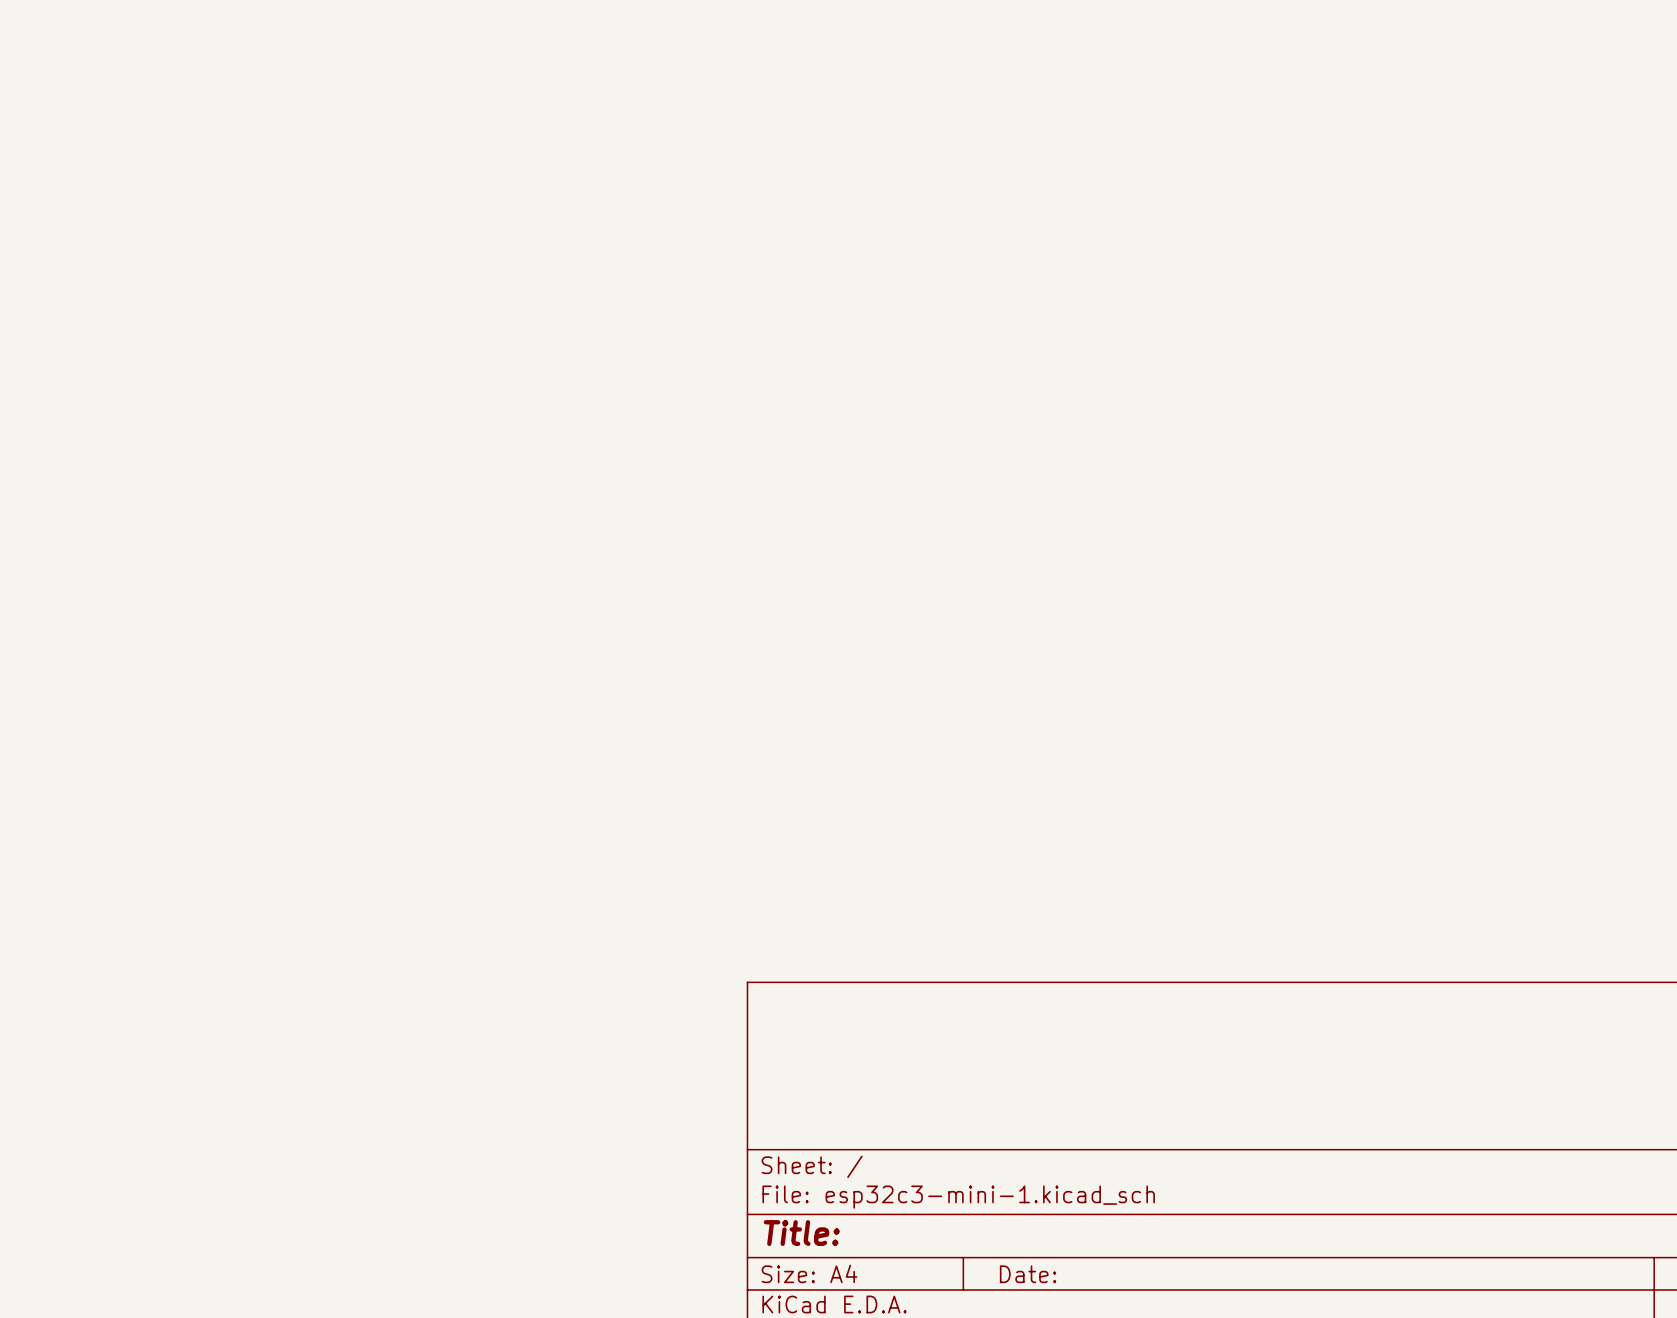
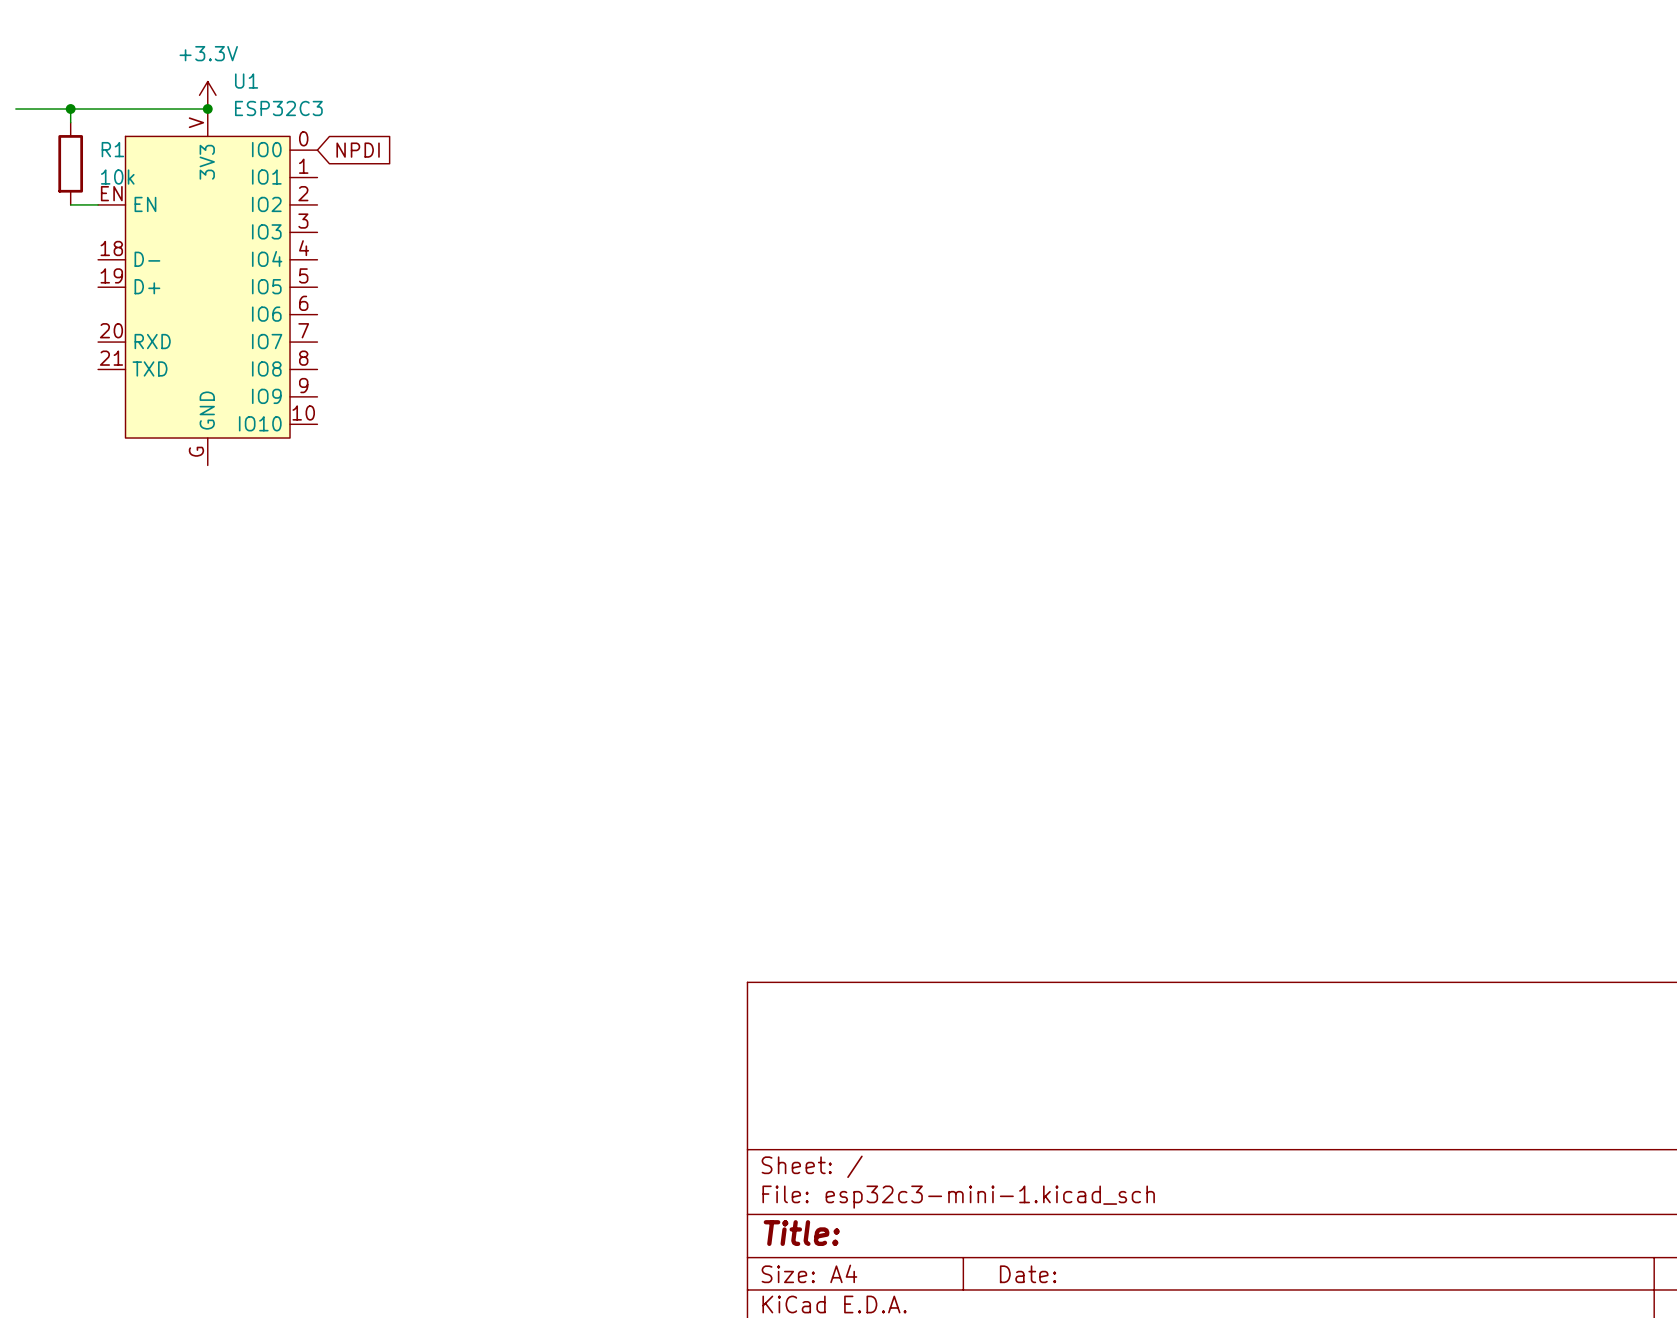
power symbol: none -> +3.3V (207, 95)
wire: none -> (15, 109) (207, 109)
wire: none -> (70, 109) (70, 122)
junction: none -> (70, 109)
junction: none -> (207, 109)
global label: none -> NPDI (358, 150)
R1: none -> 10k (70, 163)
wire: none -> (70, 204) (98, 204)
U1: none -> ESP32C3 (207, 287)

